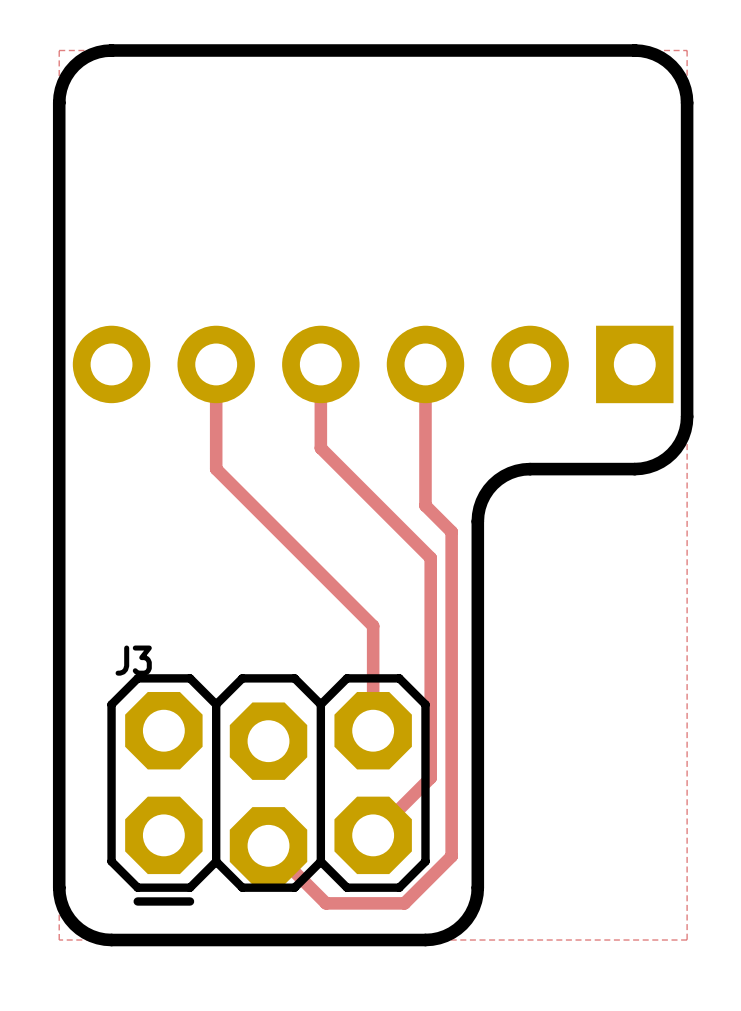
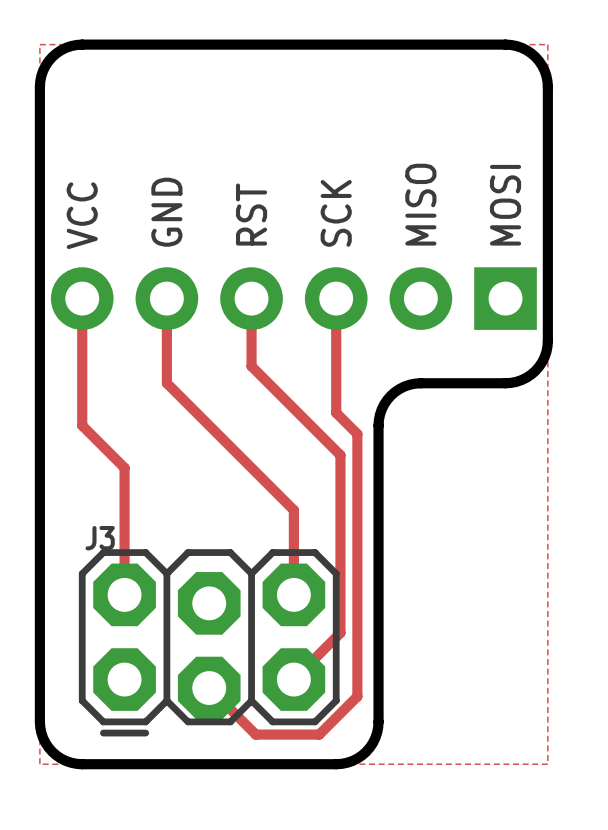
text: none -> MISO (420, 204)
text: none -> MOSI (505, 205)
text: none -> GND (166, 212)
text: none -> SCK (336, 213)
text: none -> RST (251, 214)
text: none -> VCC (82, 215)
track: none -> (82, 302) (82, 425) (124, 467) (124, 594)

